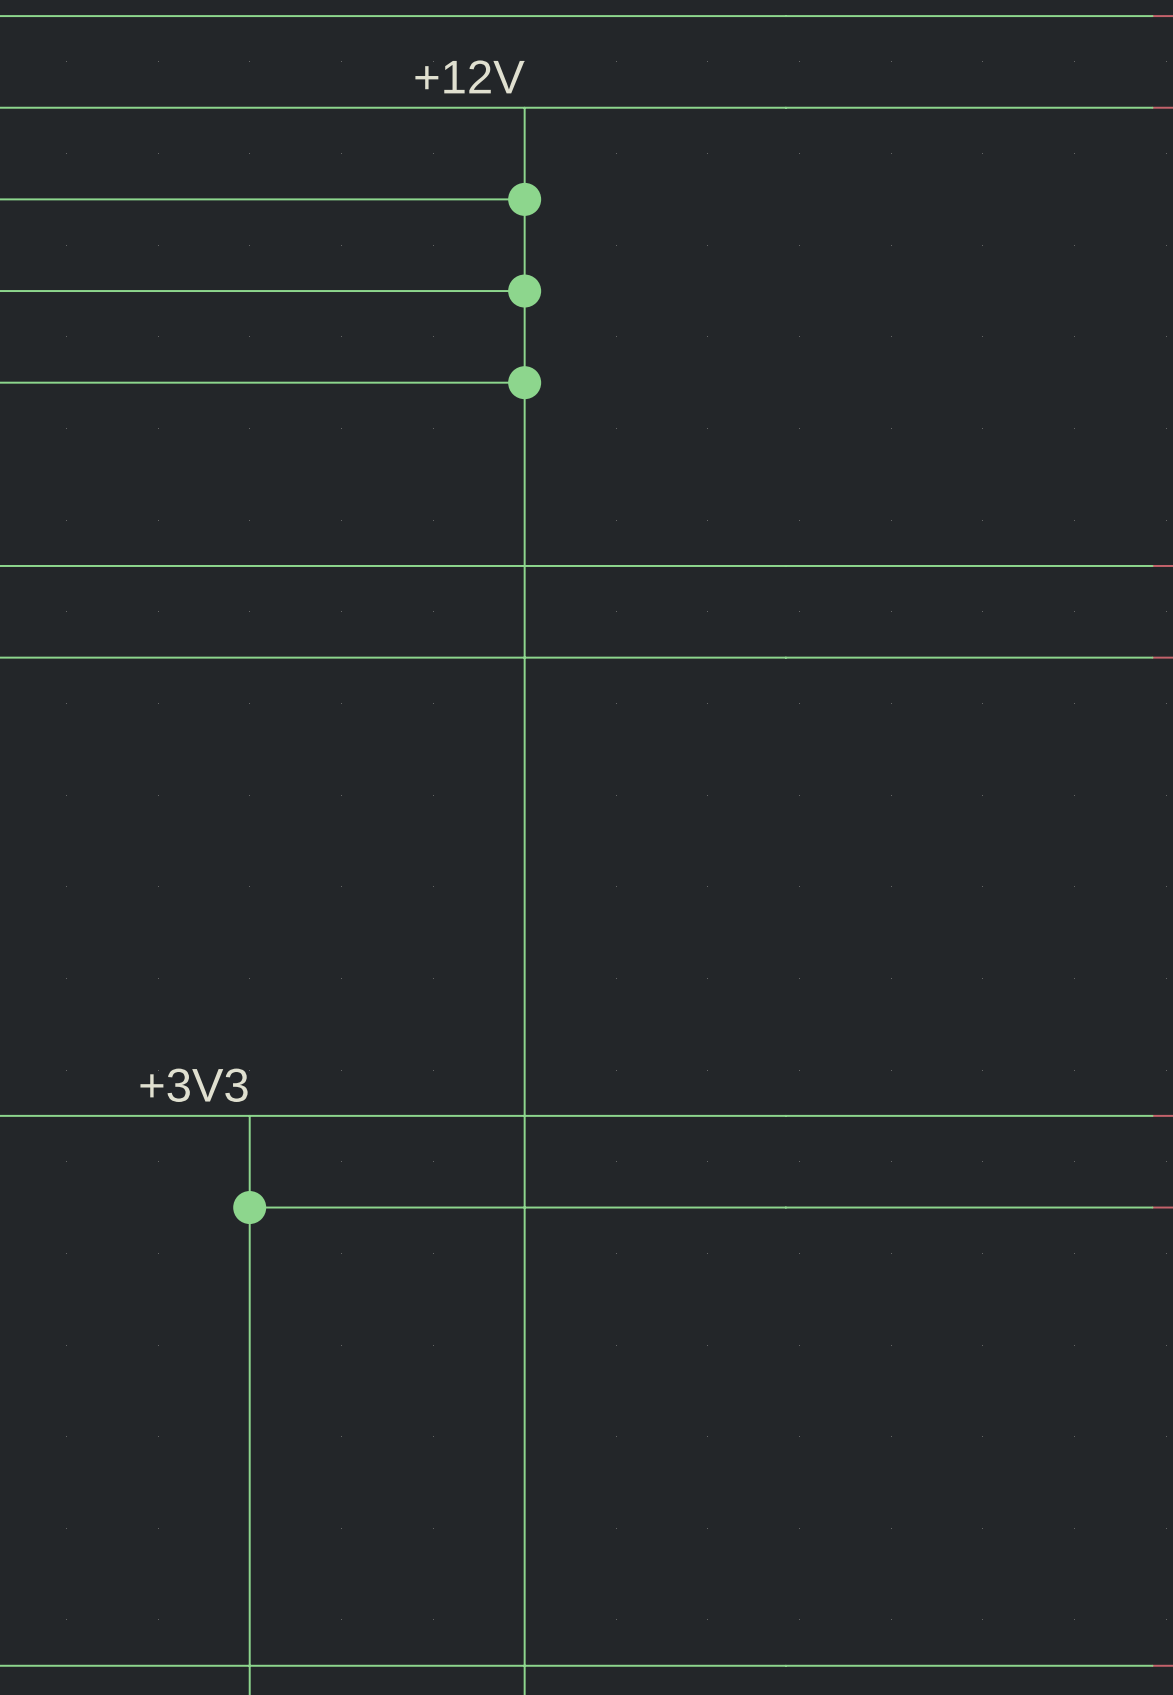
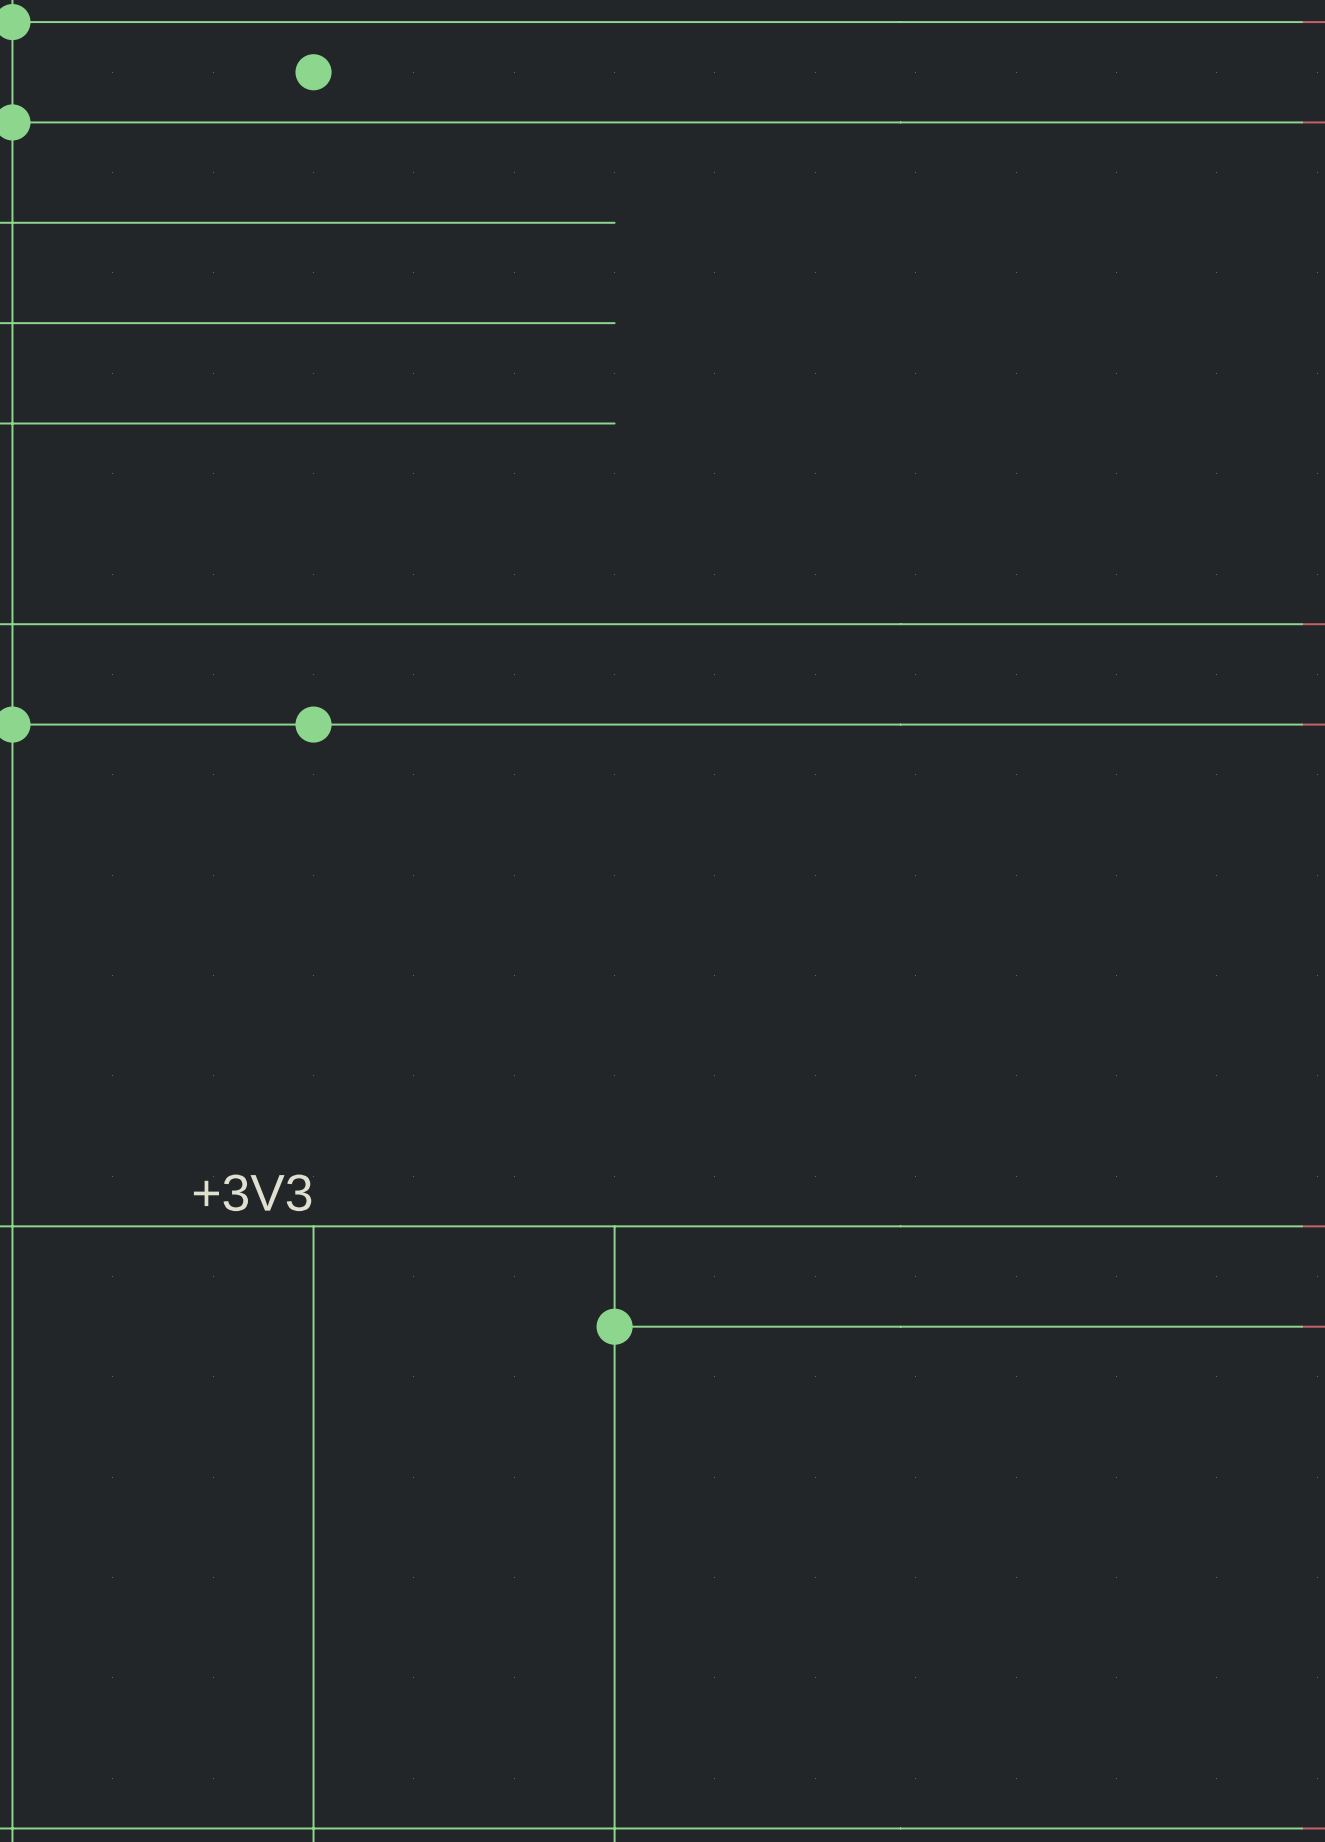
junction: none -> (313, 72)
label: +12V (469, 76) -> none
wire: (524, 107) (524, 1115) -> none
junction: (524, 199) -> none
junction: (524, 291) -> none
junction: (524, 382) -> none
junction: none -> (313, 724)
wire: (249, 1207) (524, 1207) -> none
junction: (249, 1207) -> none
junction: none -> (614, 1326)

